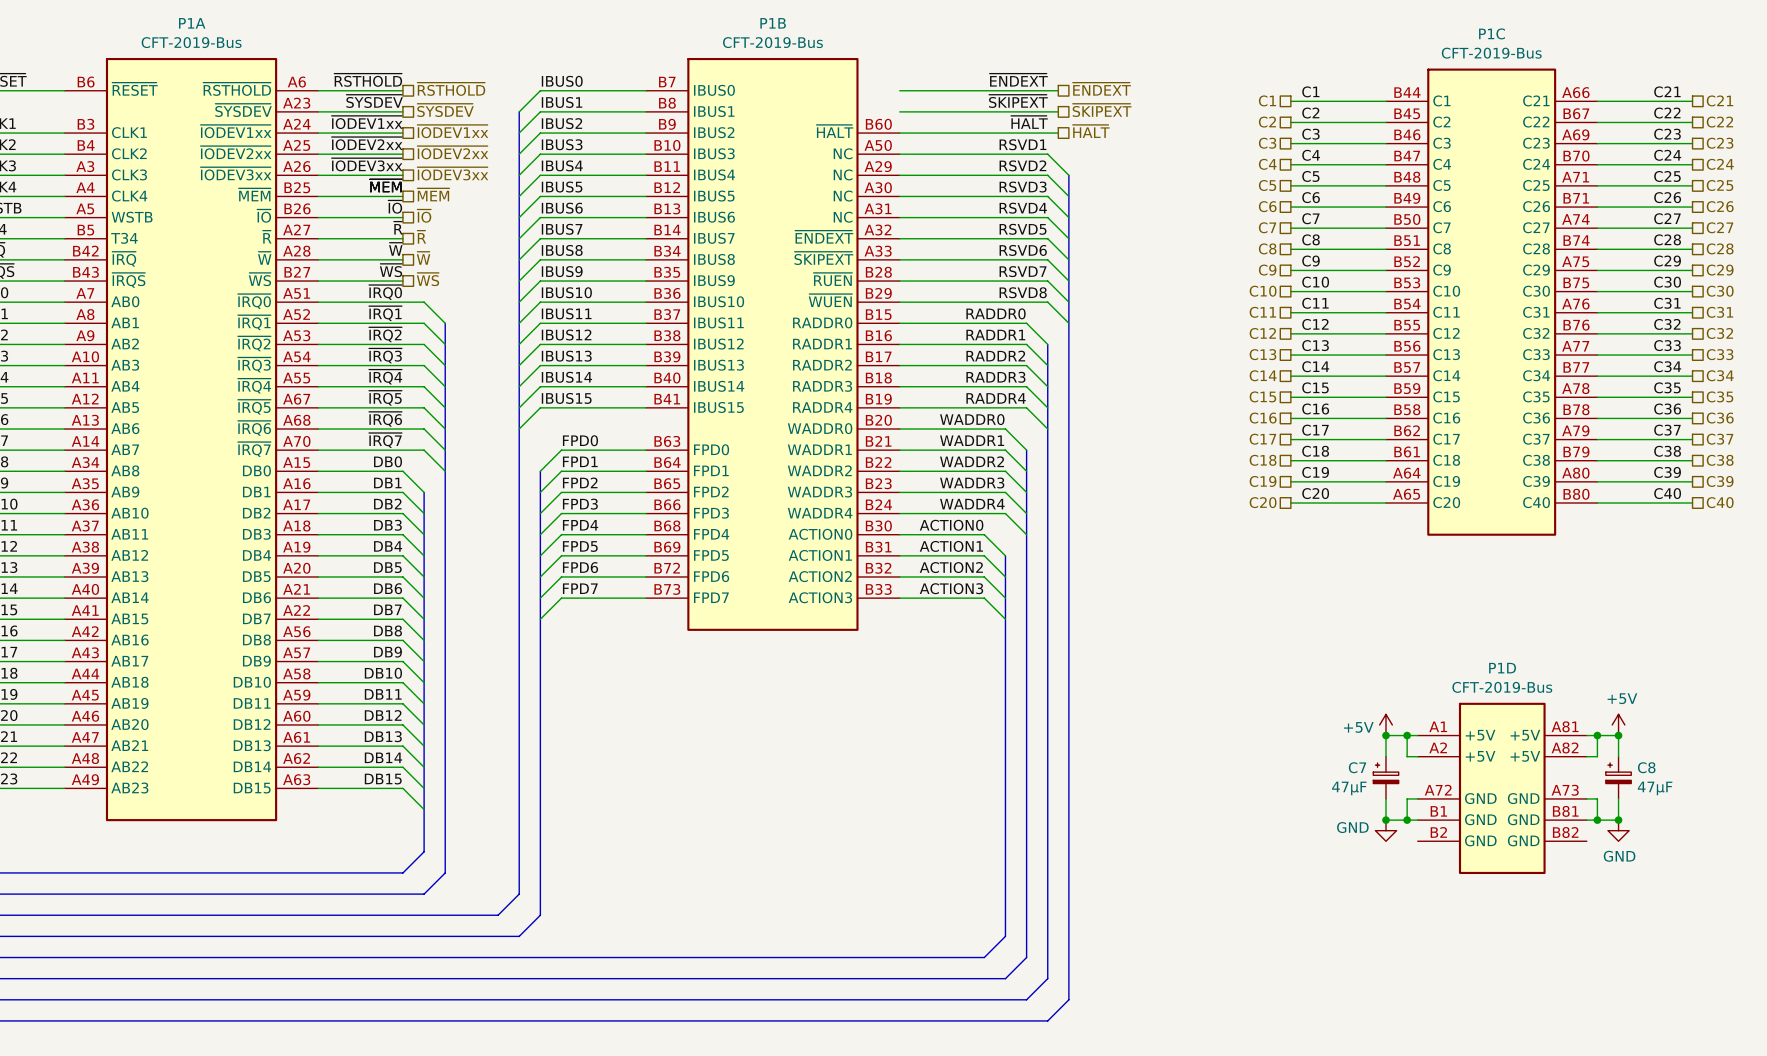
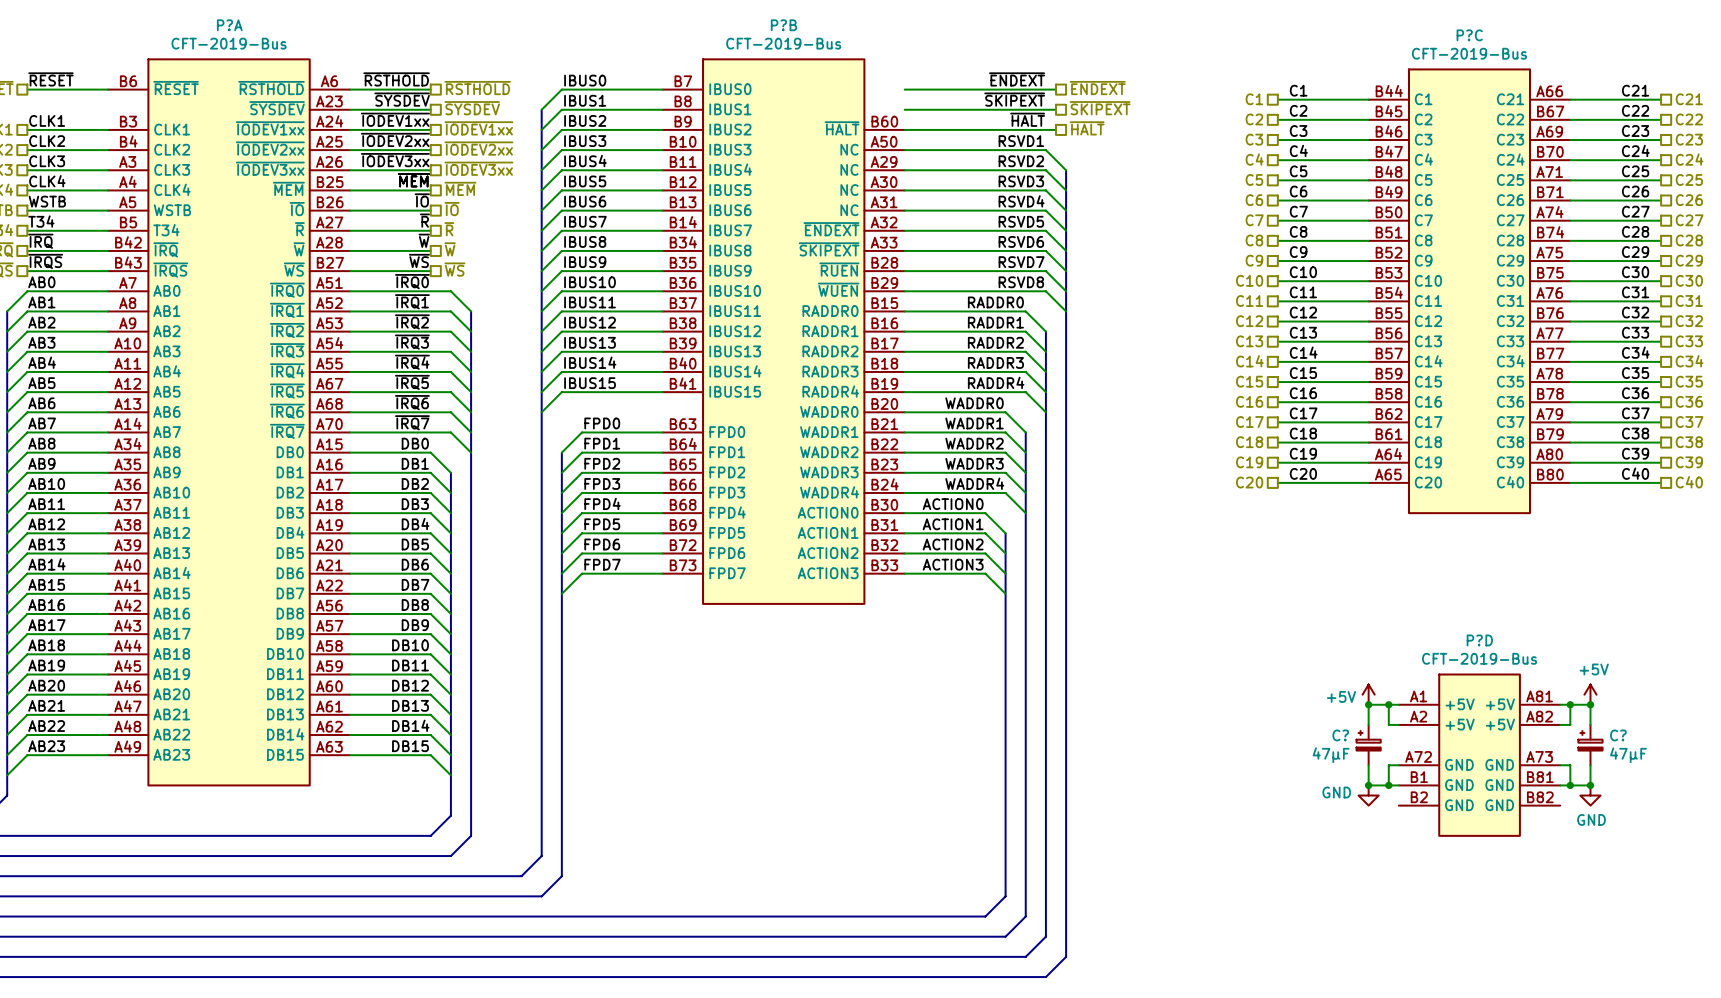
P1A name: P1A (192, 23) -> P?A (229, 25)
P1B name: P1B (773, 23) -> P?B (783, 25)
P1C name: P1C (1492, 33) -> P?C (1469, 35)
P1D name: P1D (1502, 668) -> P?D (1479, 640)
C7 name: C7 (1357, 767) -> C? (1340, 735)
C8 name: C8 (1646, 767) -> C? (1618, 735)

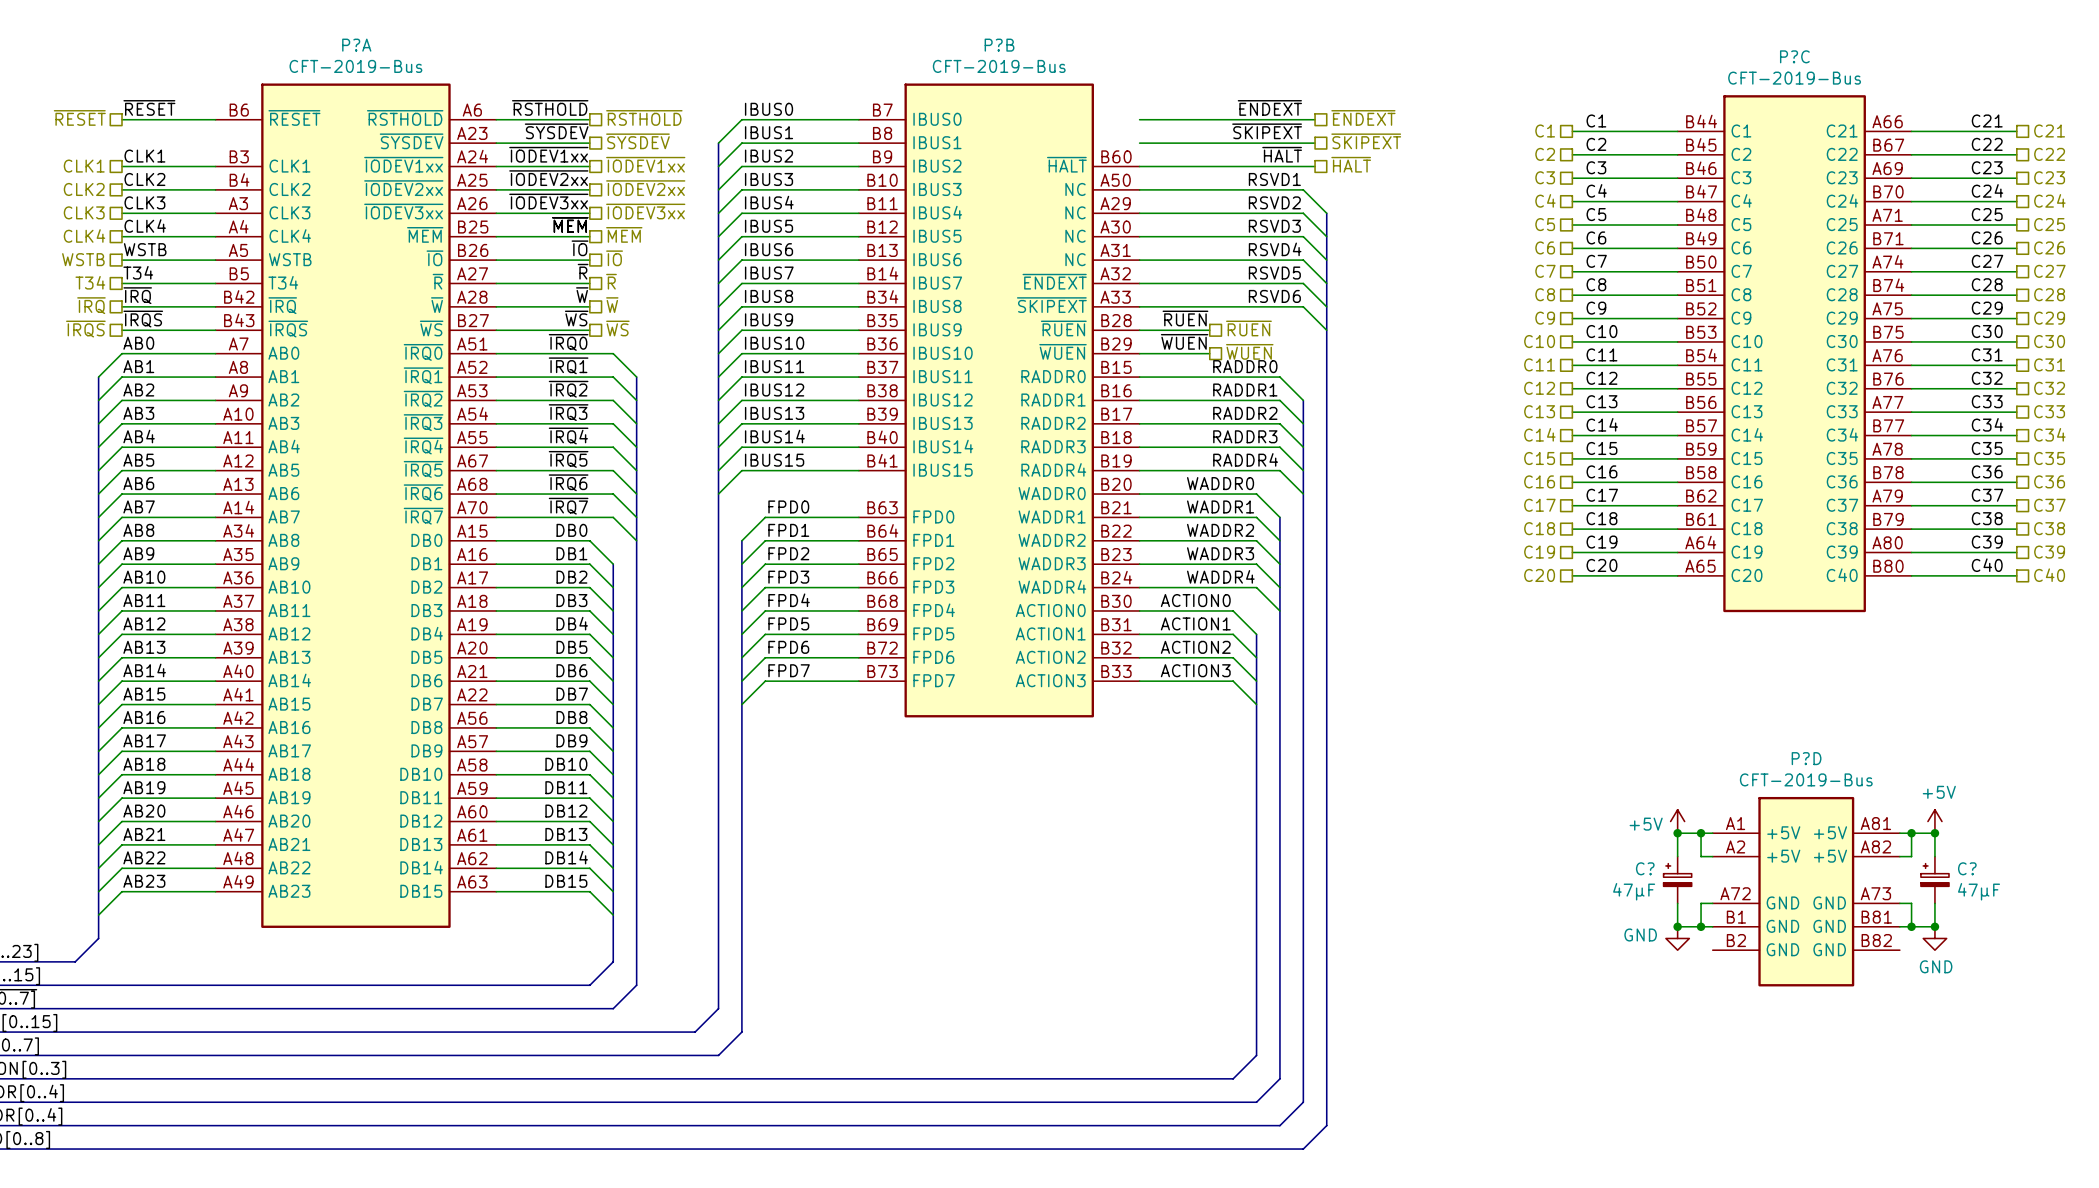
label: none -> ~{RUEN} (1185, 318)
label: RSVD7 (1021, 262) -> none
hierarchical label: none -> ~{RUEN} (1248, 328)
wire: (965, 271) (1045, 271) (1066, 291) -> none
label: none -> ~{WUEN} (1184, 341)
label: RSVD8 (1021, 282) -> none
hierarchical label: none -> ~{WUEN} (1249, 351)
wire: (965, 291) (1045, 291) (1066, 311) -> none

